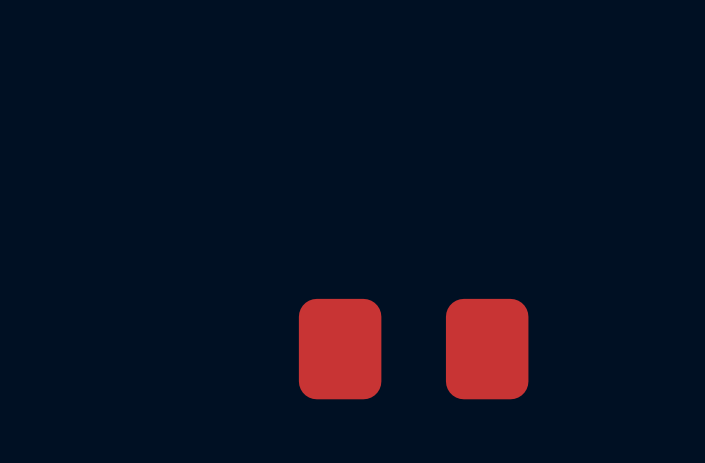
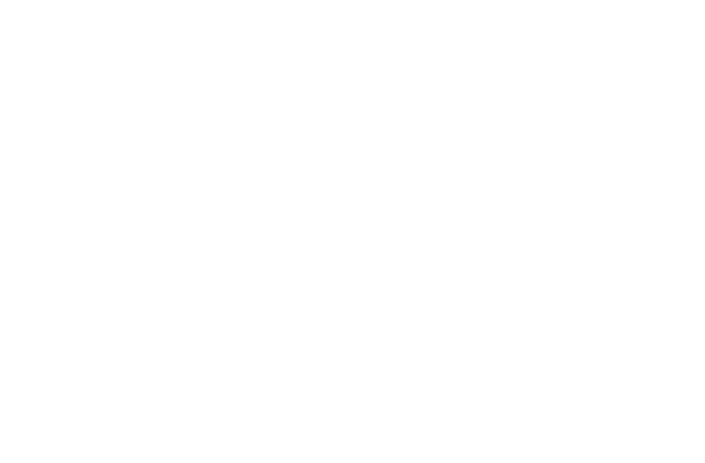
part: (413, 349) -> none

